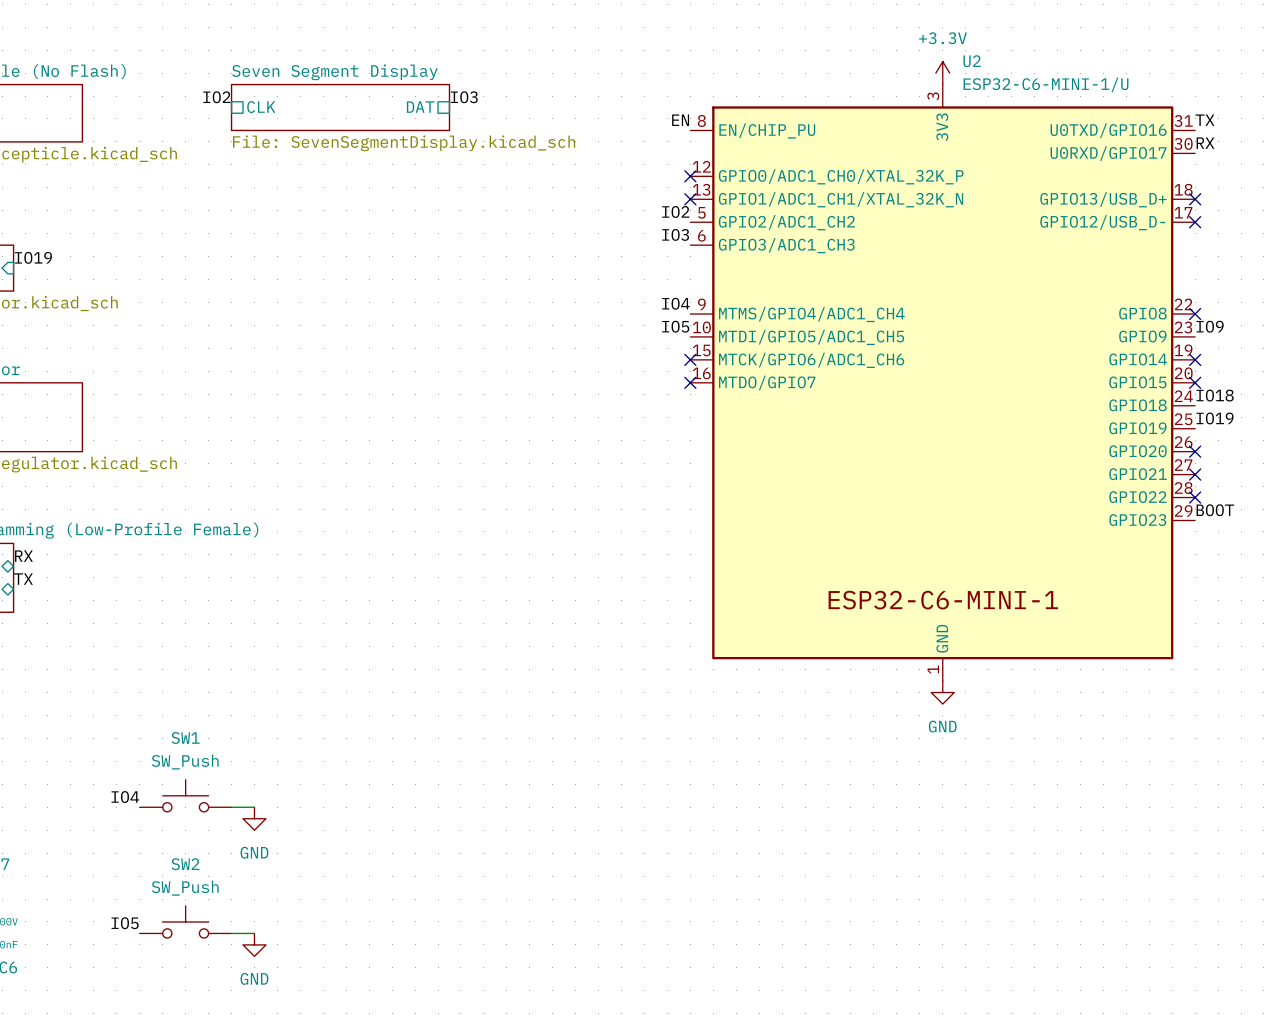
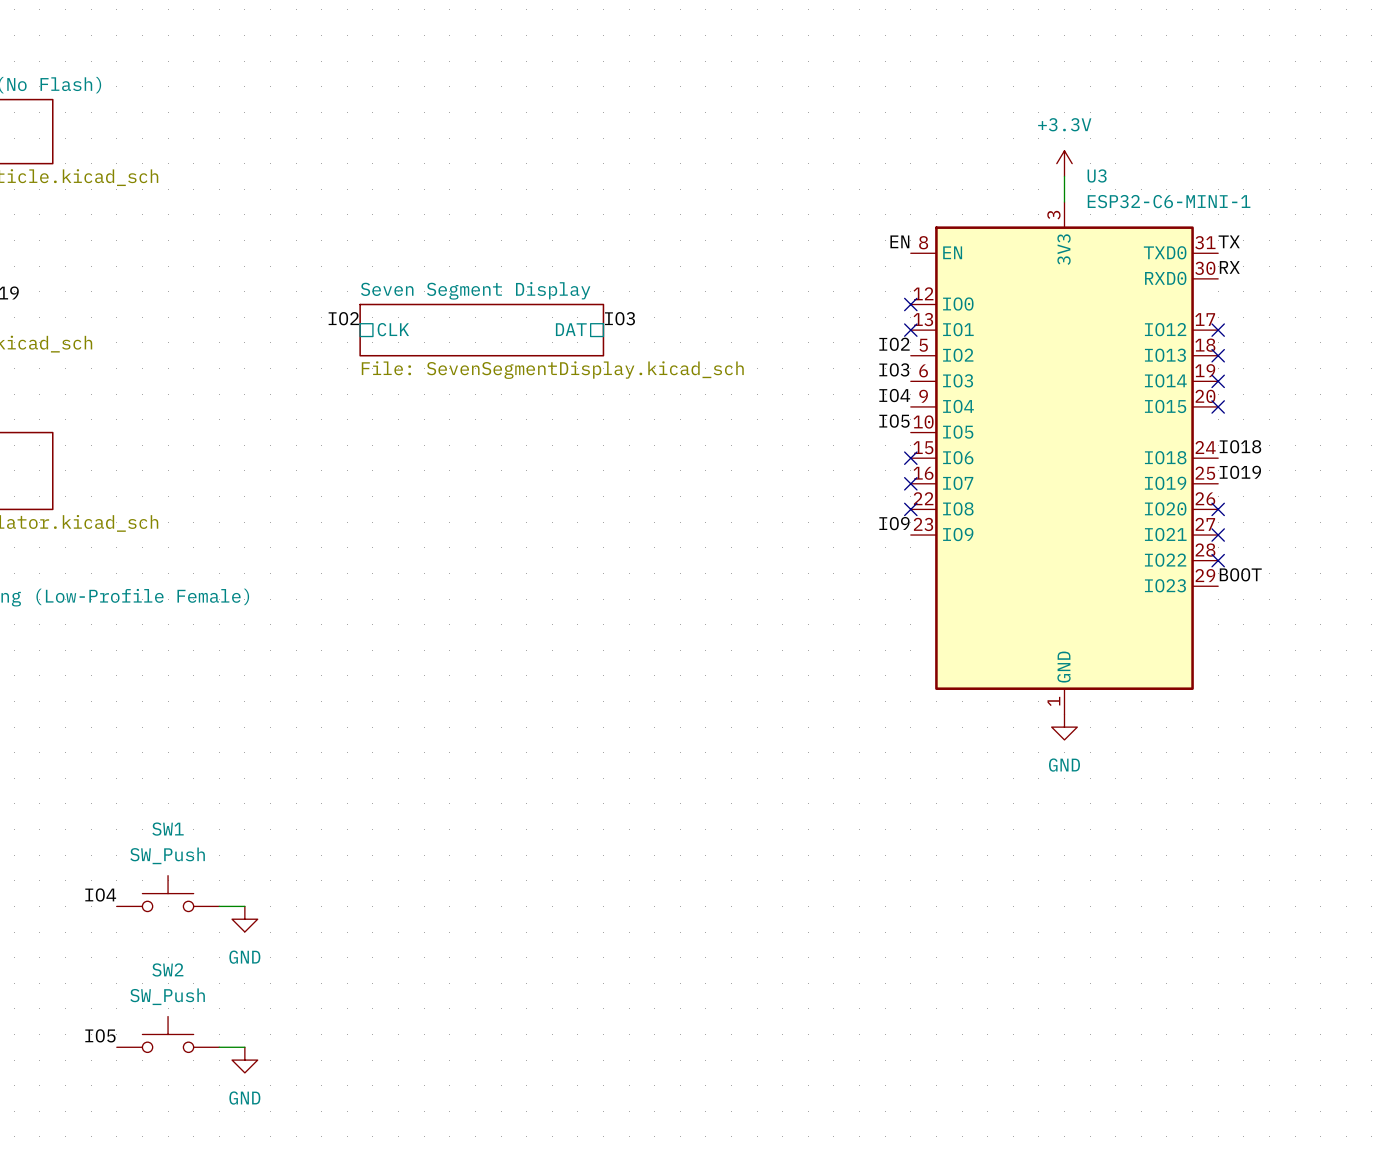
power symbol position: +3.3V (942, 73) -> +3.3V (1064, 163)
label: IO2 (216, 97) -> none
label: IO3 (464, 97) -> none
sheet pin position: CLK (261, 107) -> CLK (393, 329)
sheet Seven Segment Display position: (340, 107) -> (481, 330)
sheet pin position: DAT (420, 107) -> DAT (571, 329)
label position: EN (680, 120) -> EN (899, 241)
label position: TX (1204, 120) -> TX (1229, 241)
label position: RX (1205, 143) -> RX (1229, 267)
no-connect mark: (690, 176) -> none
no-connect mark: (690, 199) -> none
no-connect mark: (1195, 199) -> none
label: IO2 (675, 211) -> none
no-connect mark: (1195, 222) -> none
label: IO3 (675, 234) -> none
no-connect mark: none -> (910, 304)
label: none -> IO2 (343, 318)
label: none -> IO3 (619, 318)
no-connect mark: none -> (910, 330)
no-connect mark: none -> (1218, 330)
label position: IO4 (675, 303) -> IO4 (894, 395)
label: none -> IO2 (894, 344)
no-connect mark: none -> (1218, 355)
no-connect mark: (1195, 313) -> none
label position: IO5 (675, 326) -> IO5 (894, 421)
label: none -> IO3 (894, 369)
label: IO9 (1210, 326) -> none
no-connect mark: none -> (1218, 381)
no-connect mark: (690, 359) -> none
no-connect mark: none -> (1218, 406)
no-connect mark: (1195, 359) -> none
no-connect mark: (690, 382) -> none
U2: ESP32-C6-MINI-1/U (942, 382) -> none
no-connect mark: (1195, 382) -> none
label position: IO18 (1215, 395) -> IO18 (1240, 446)
no-connect mark: none -> (910, 458)
U3: none -> ESP32-C6-MINI-1 (1064, 458)
label position: IO19 (1215, 418) -> IO19 (1240, 472)
no-connect mark: none -> (910, 483)
no-connect mark: none -> (910, 509)
no-connect mark: none -> (1218, 509)
no-connect mark: (1195, 451) -> none
label: none -> IO9 (894, 523)
no-connect mark: none -> (1218, 535)
no-connect mark: (1195, 474) -> none
no-connect mark: none -> (1218, 560)
no-connect mark: (1195, 497) -> none
label position: BOOT (1215, 510) -> BOOT (1240, 574)
power symbol position: GND (942, 692) -> GND (1064, 727)

